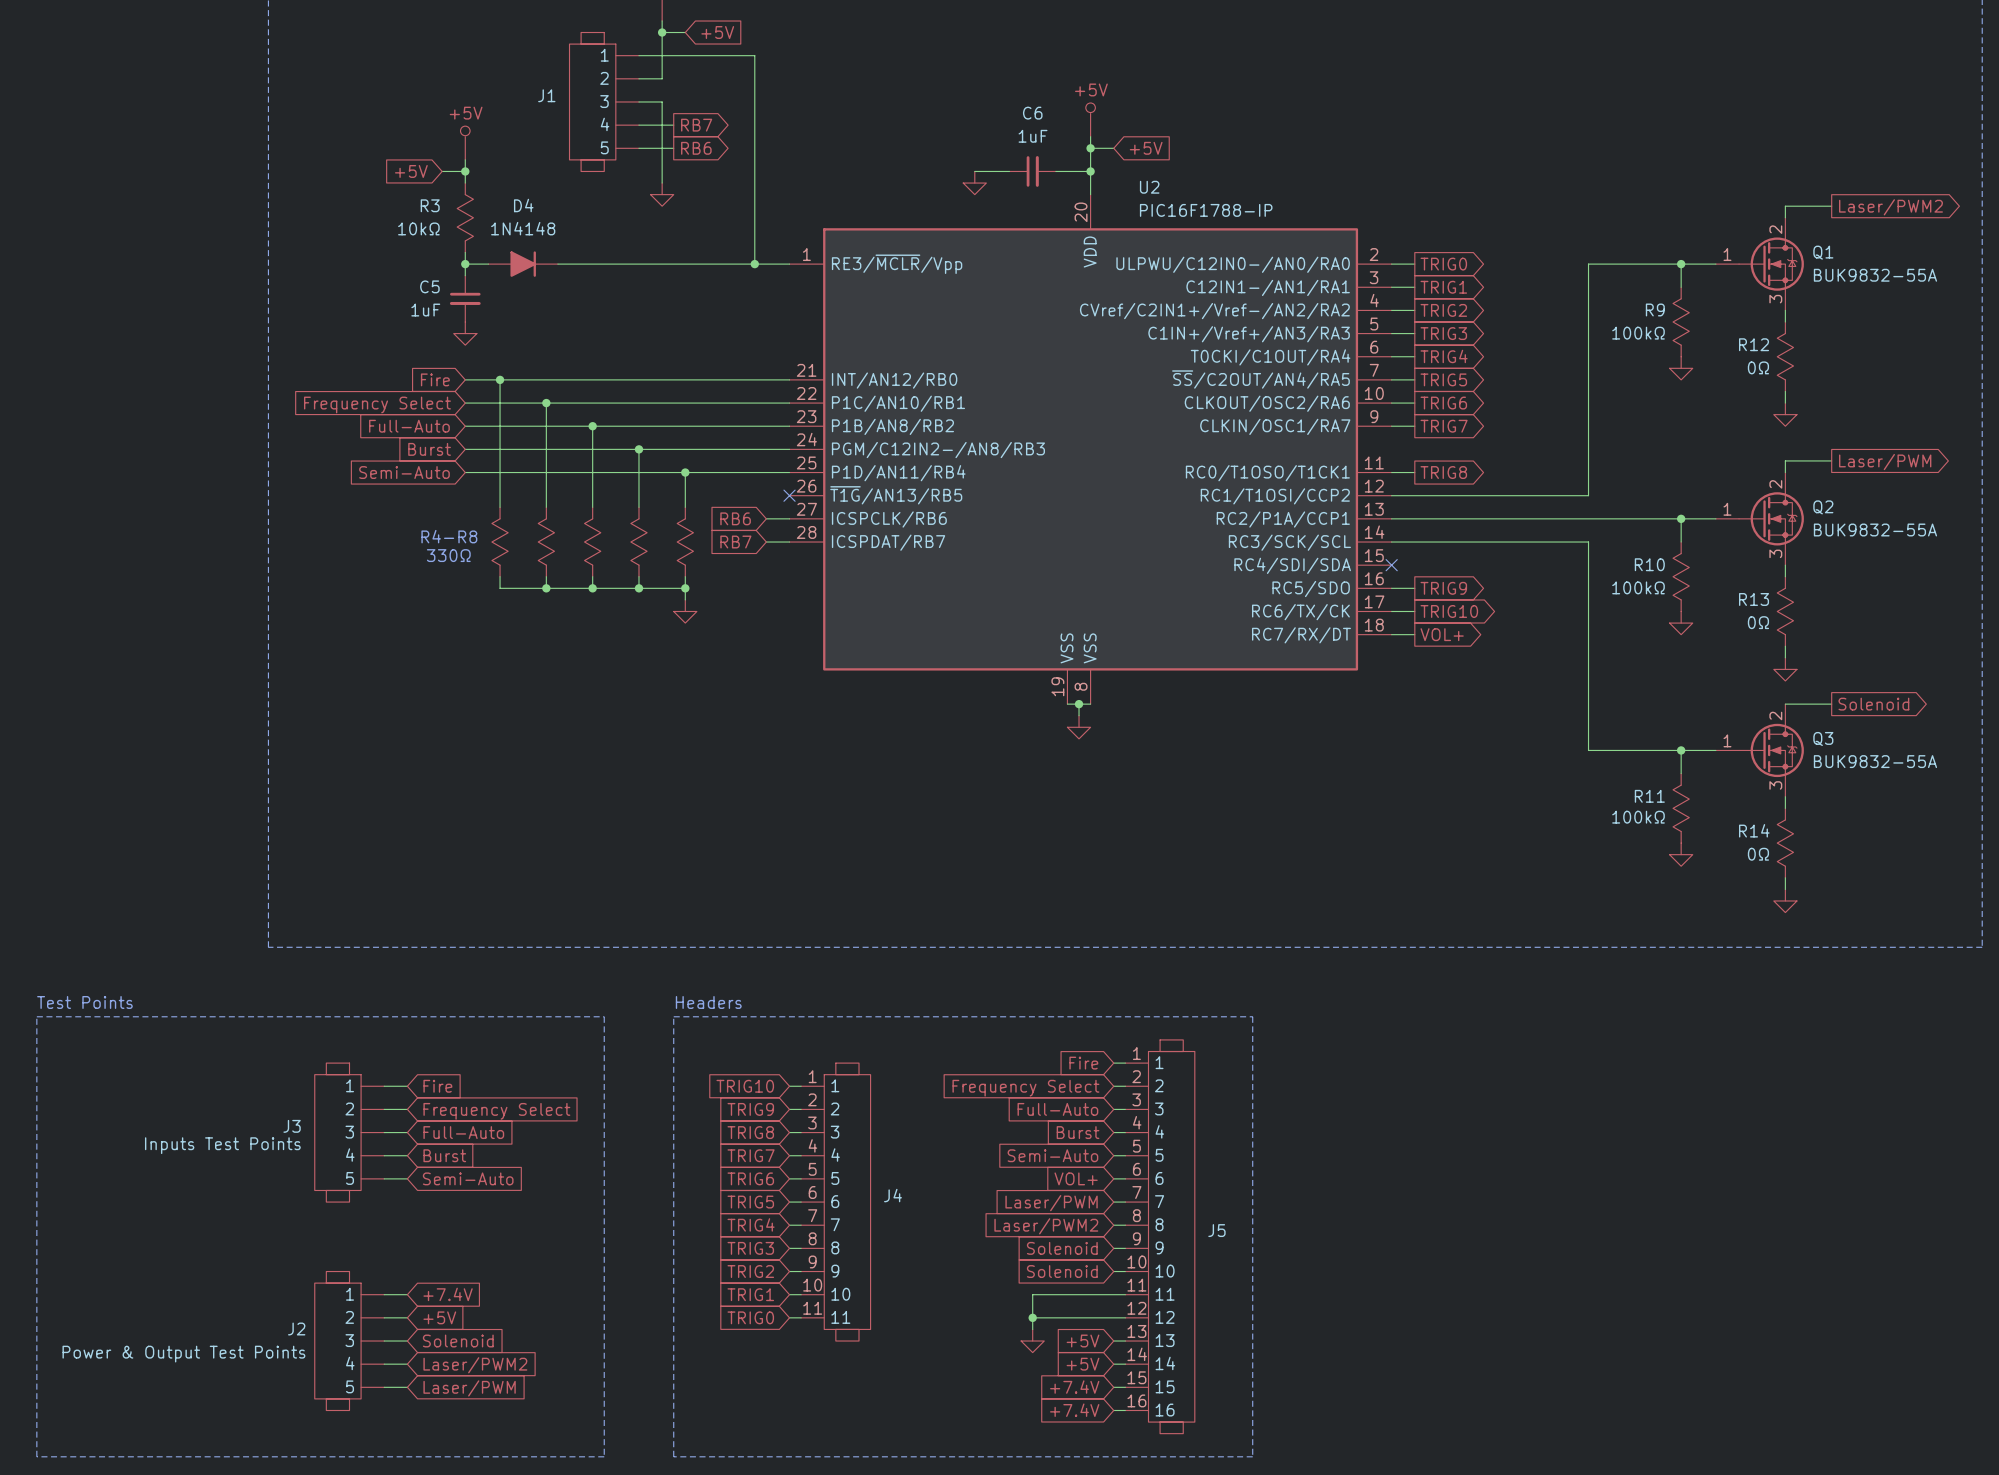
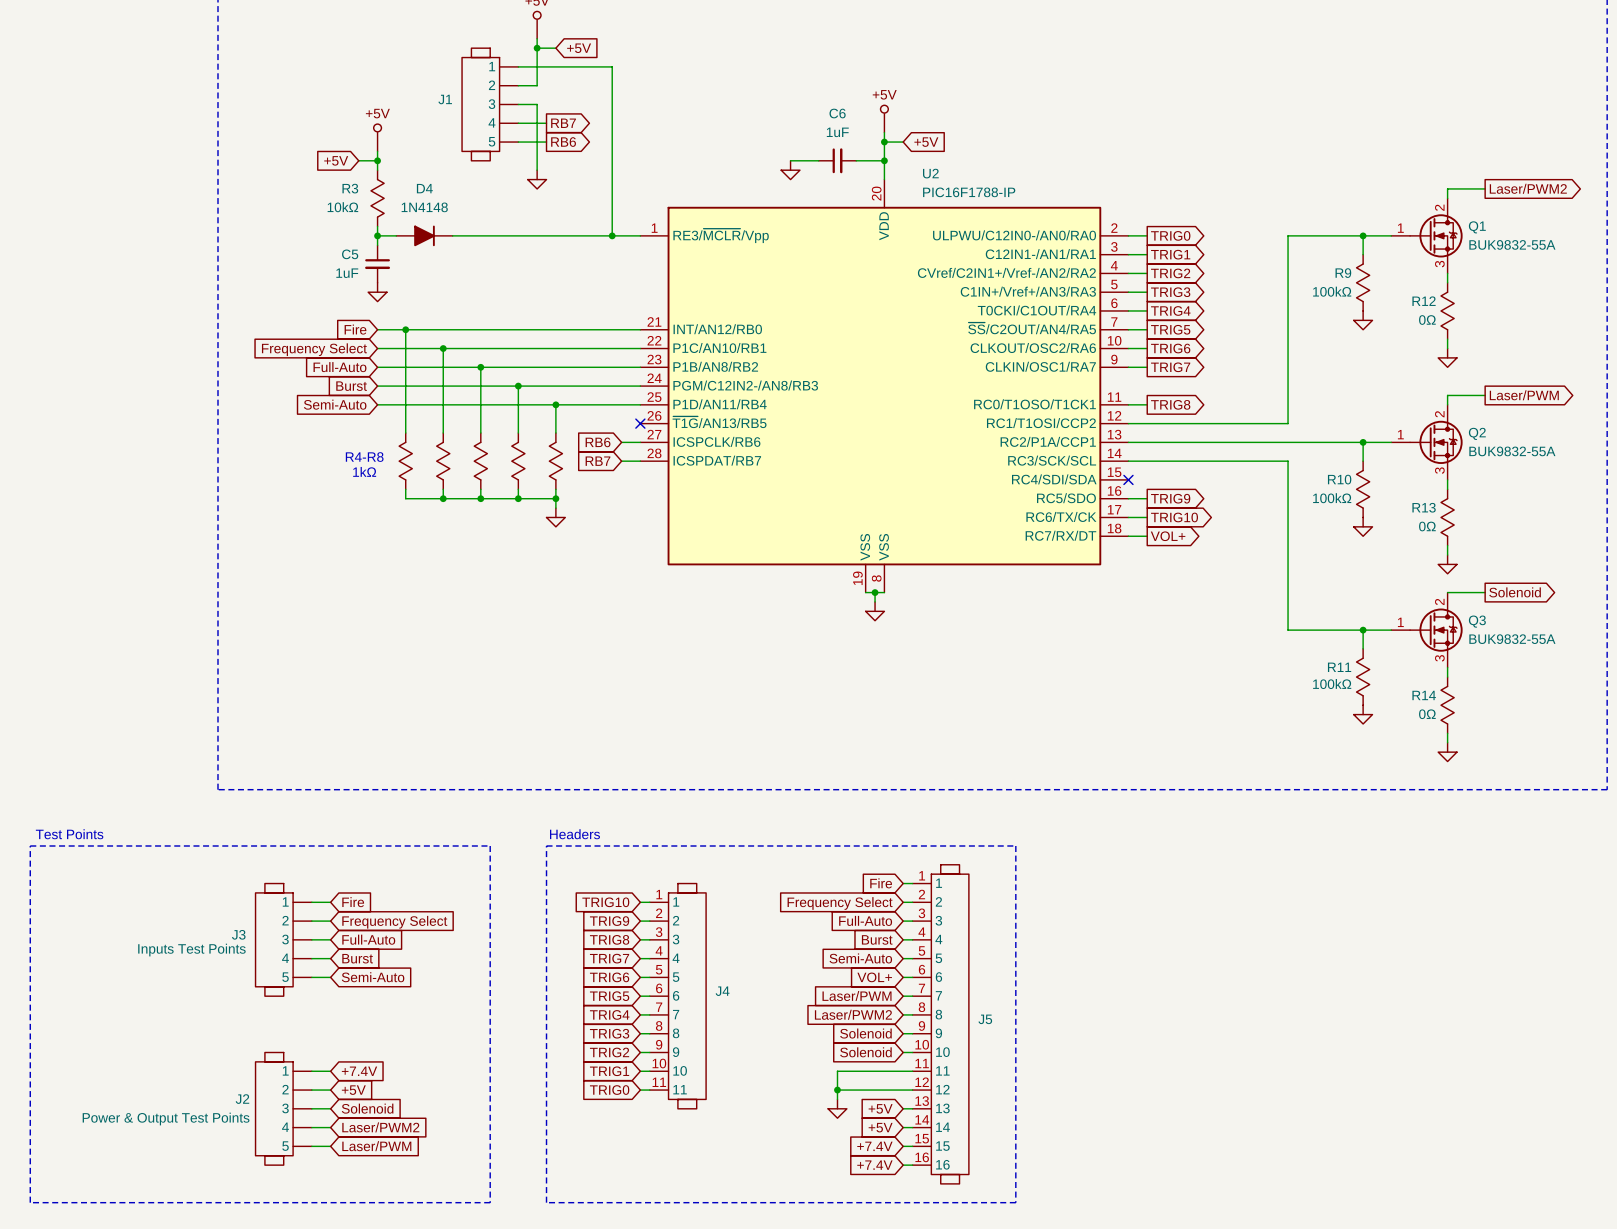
text: 330Ω (448, 555) -> 1kΩ (364, 471)

